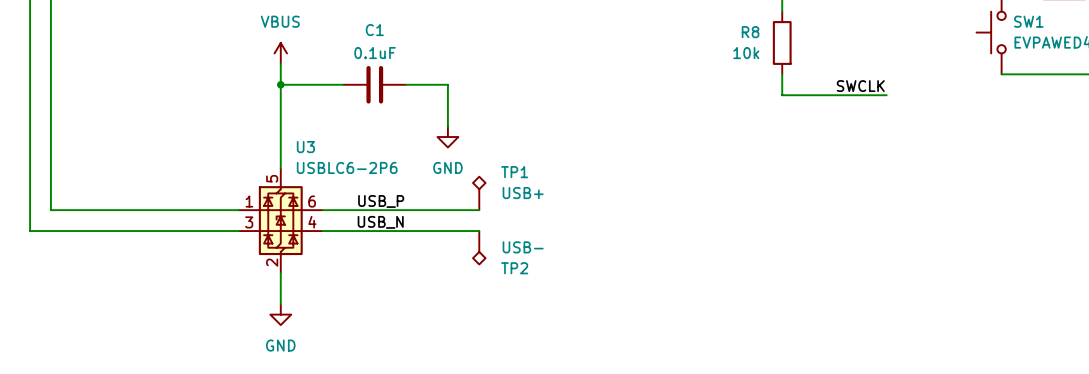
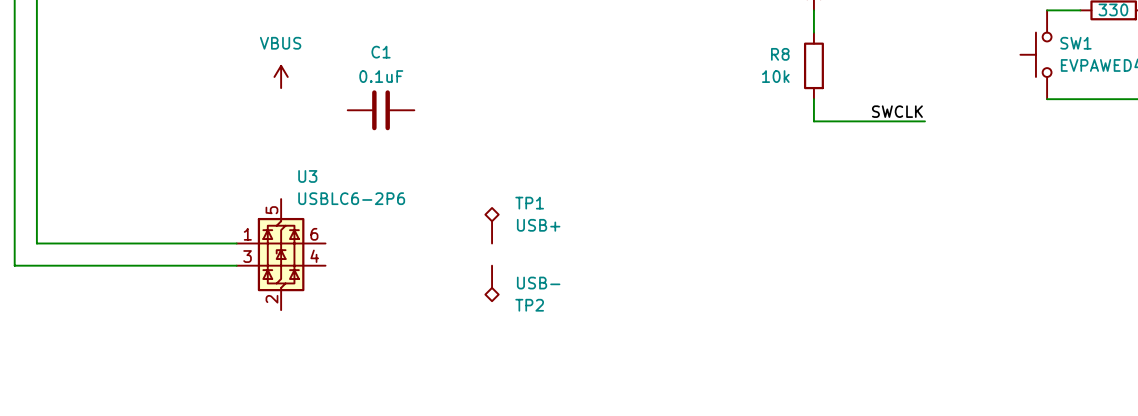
wire: (280, 63) (280, 168) -> none
wire: (280, 84) (343, 84) -> none
junction: (280, 84) -> none
wire: (406, 84) (447, 84) (447, 126) -> none
power symbol: GND (447, 137) -> none
label: USB_P (381, 201) -> none
wire: (322, 210) (479, 210) -> none
label: USB_N (380, 222) -> none
wire: (322, 231) (479, 231) -> none
wire: (280, 272) (280, 304) -> none
power symbol: GND (280, 314) -> none

